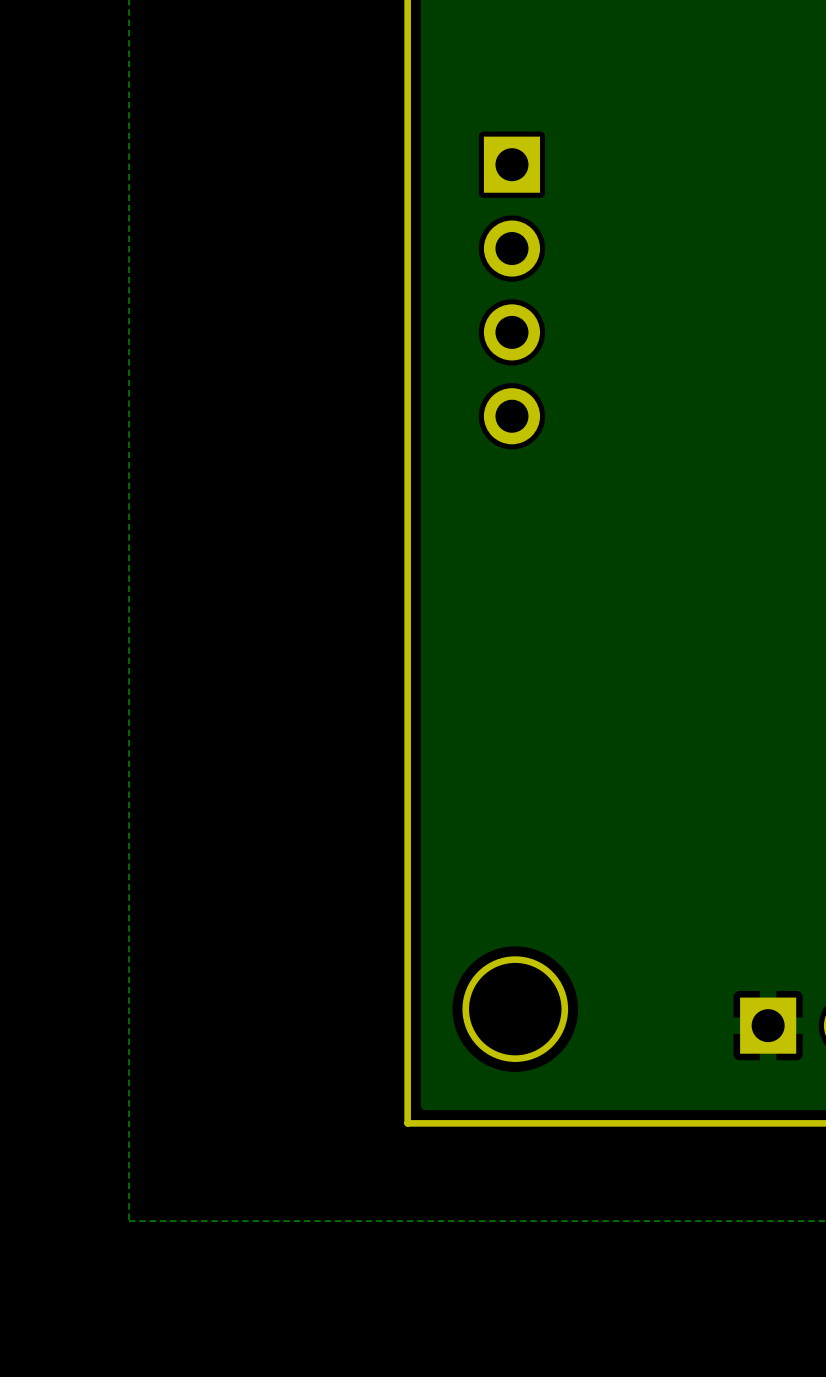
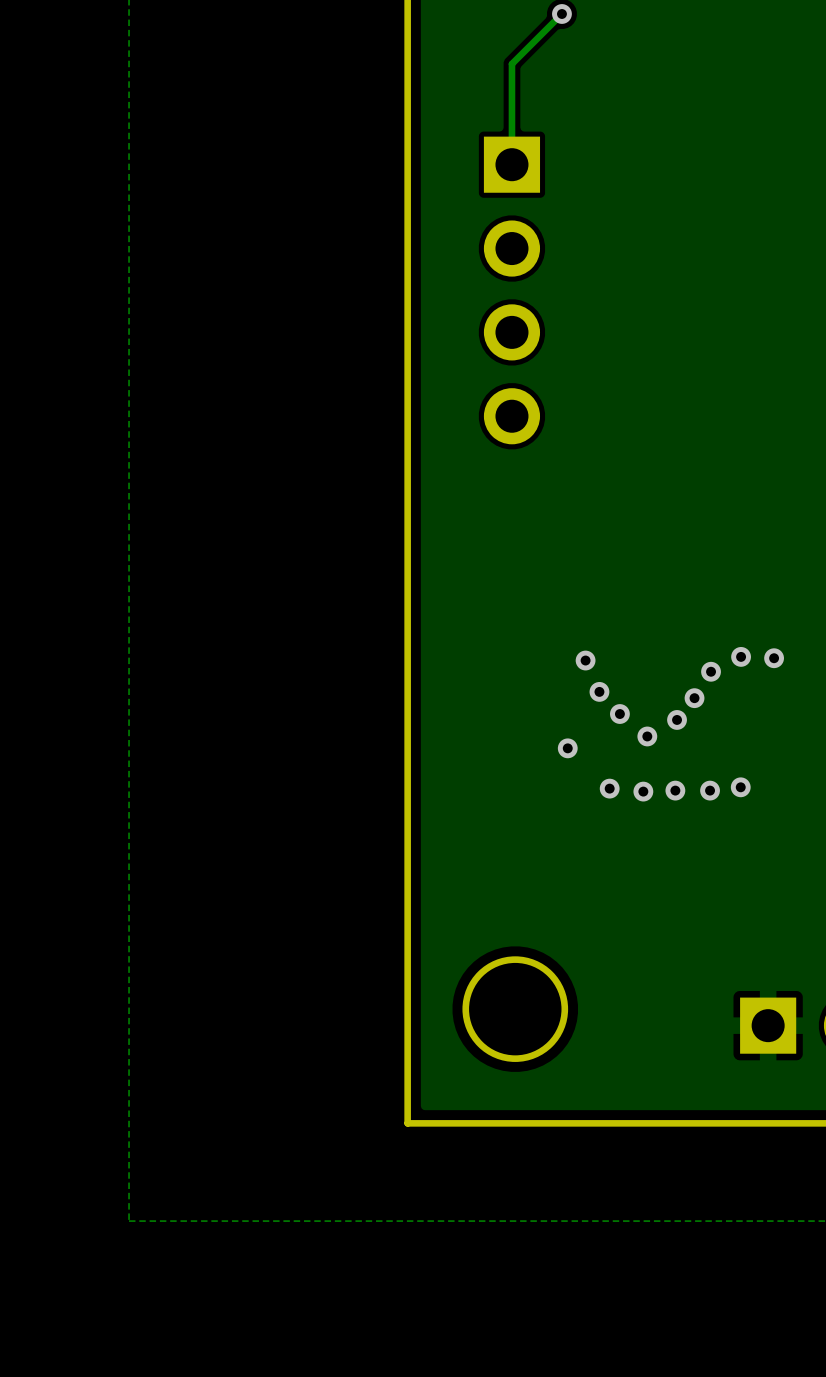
track: none -> (561, 13) (511, 63) (511, 164)
via: none -> (561, 13)
via: none -> (741, 656)
via: none -> (774, 658)
via: none -> (585, 660)
via: none -> (711, 671)
via: none -> (599, 691)
via: none -> (694, 698)
via: none -> (619, 714)
via: none -> (677, 719)
via: none -> (647, 736)
via: none -> (567, 748)
via: none -> (740, 787)
via: none -> (609, 788)
via: none -> (675, 790)
via: none -> (710, 790)
via: none -> (643, 791)

